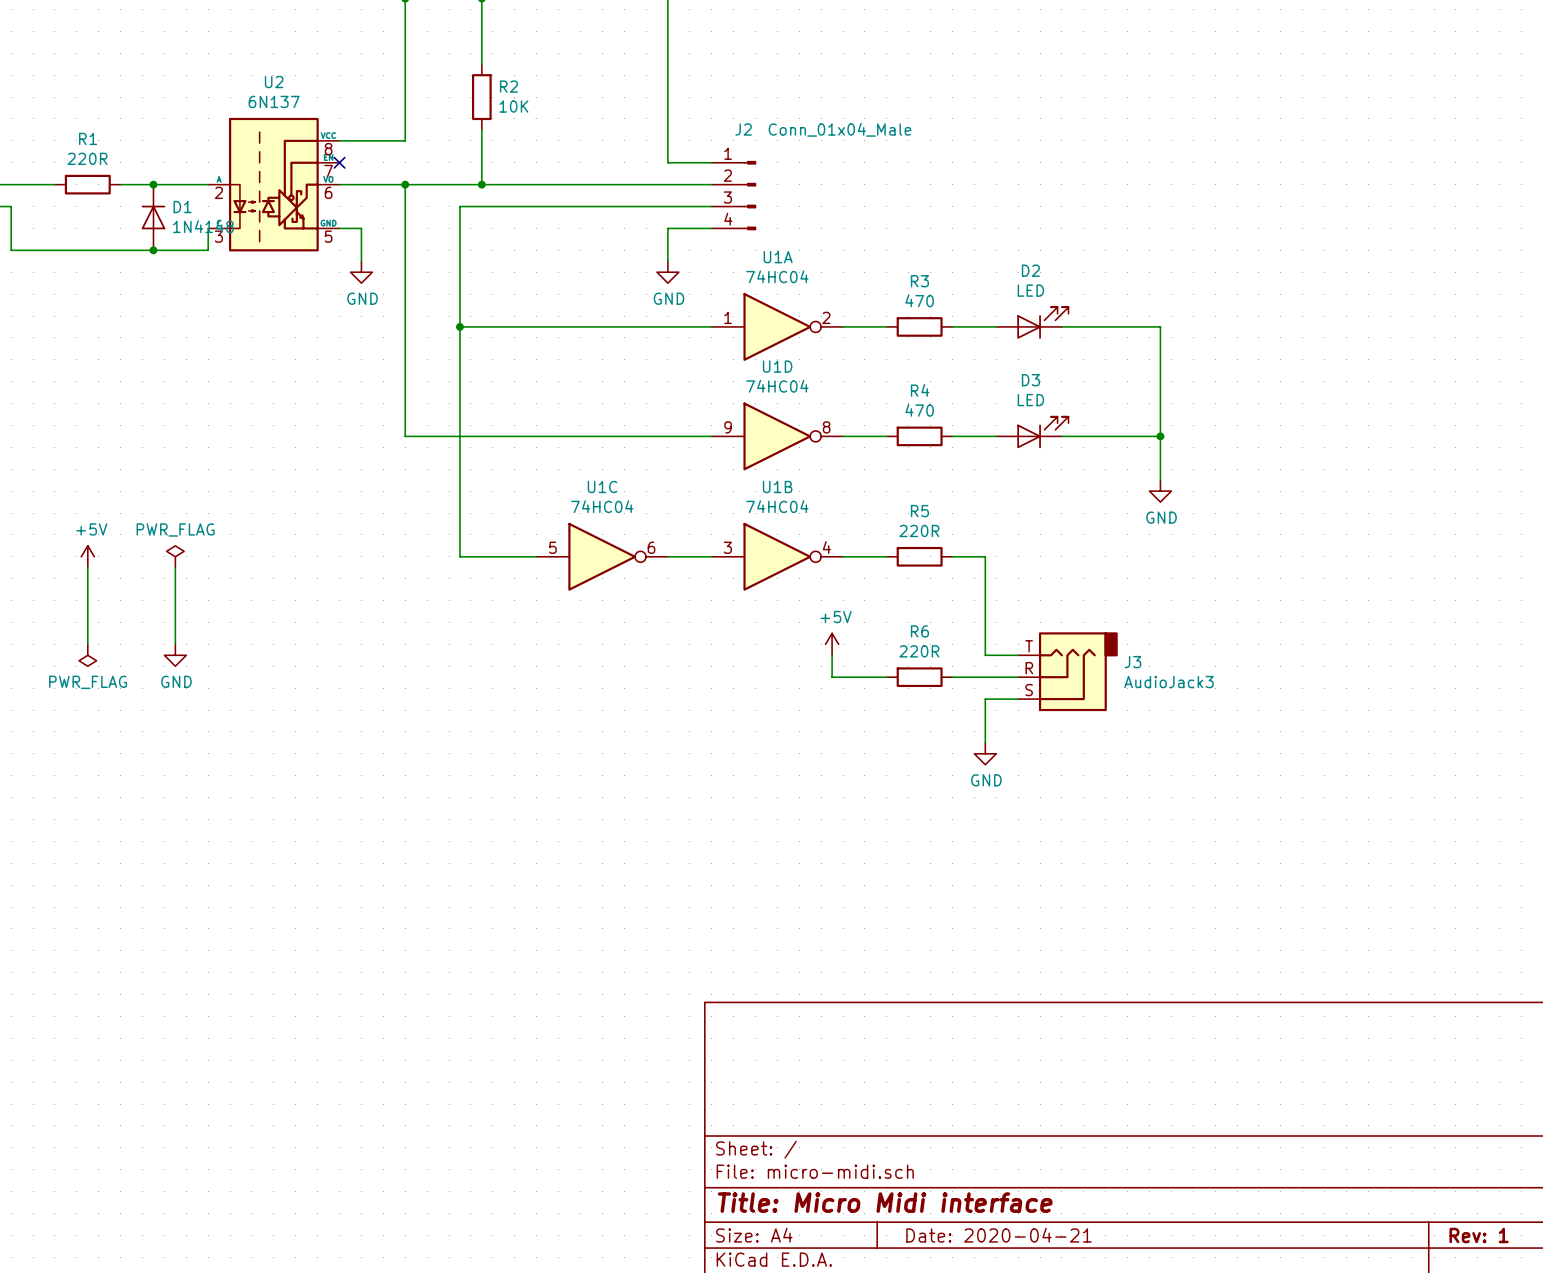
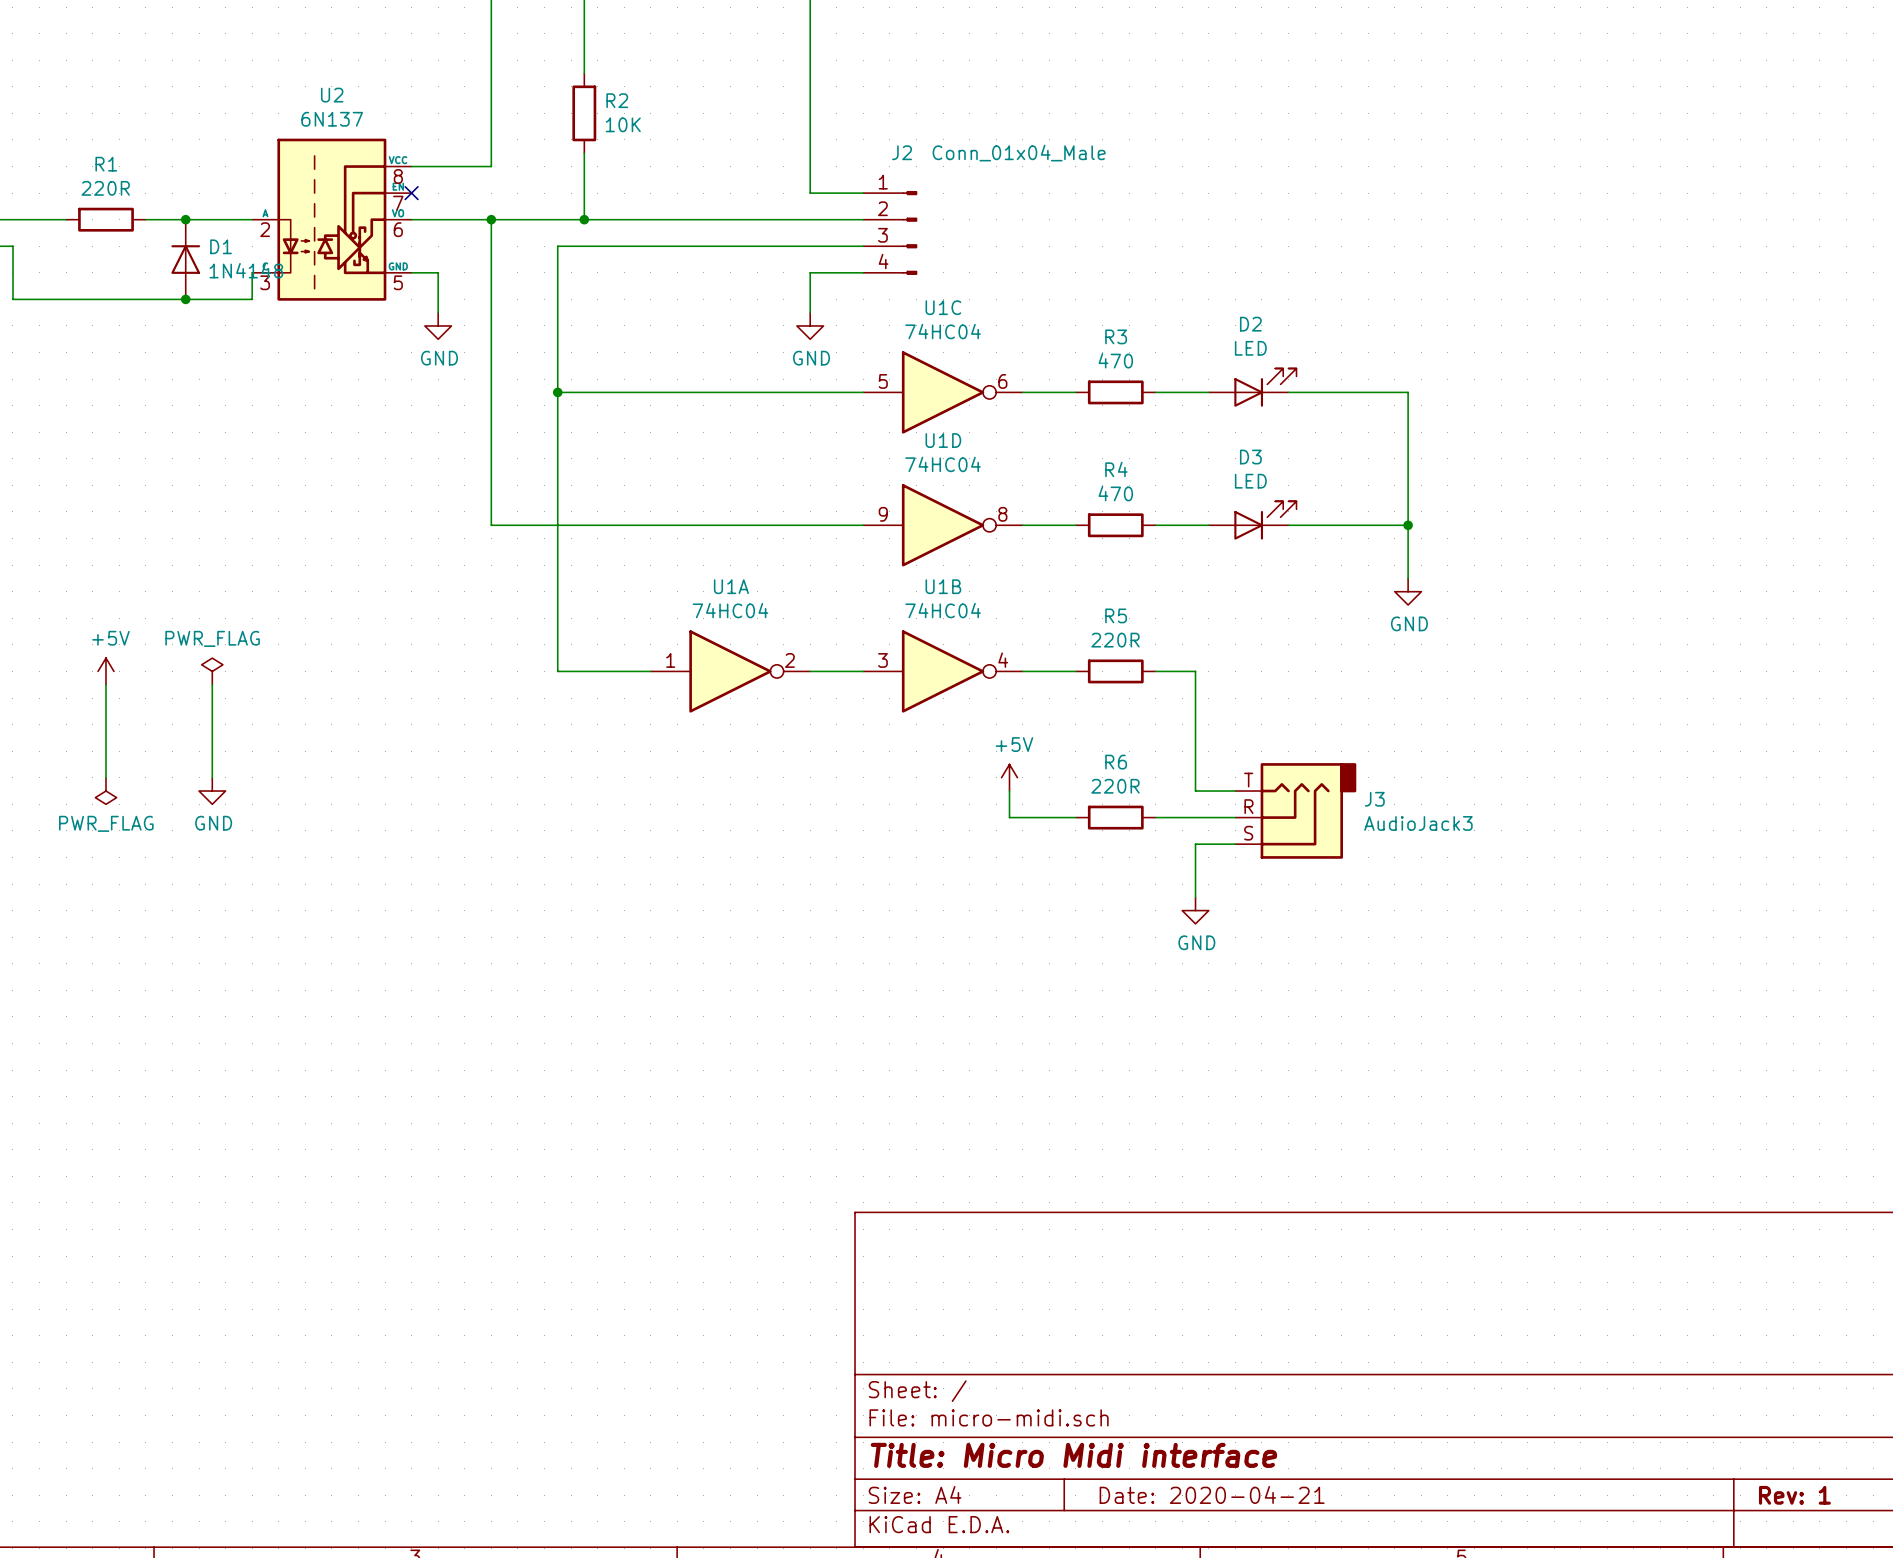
U1A position: (777, 326) -> (730, 671)
U1C position: (602, 556) -> (943, 392)

